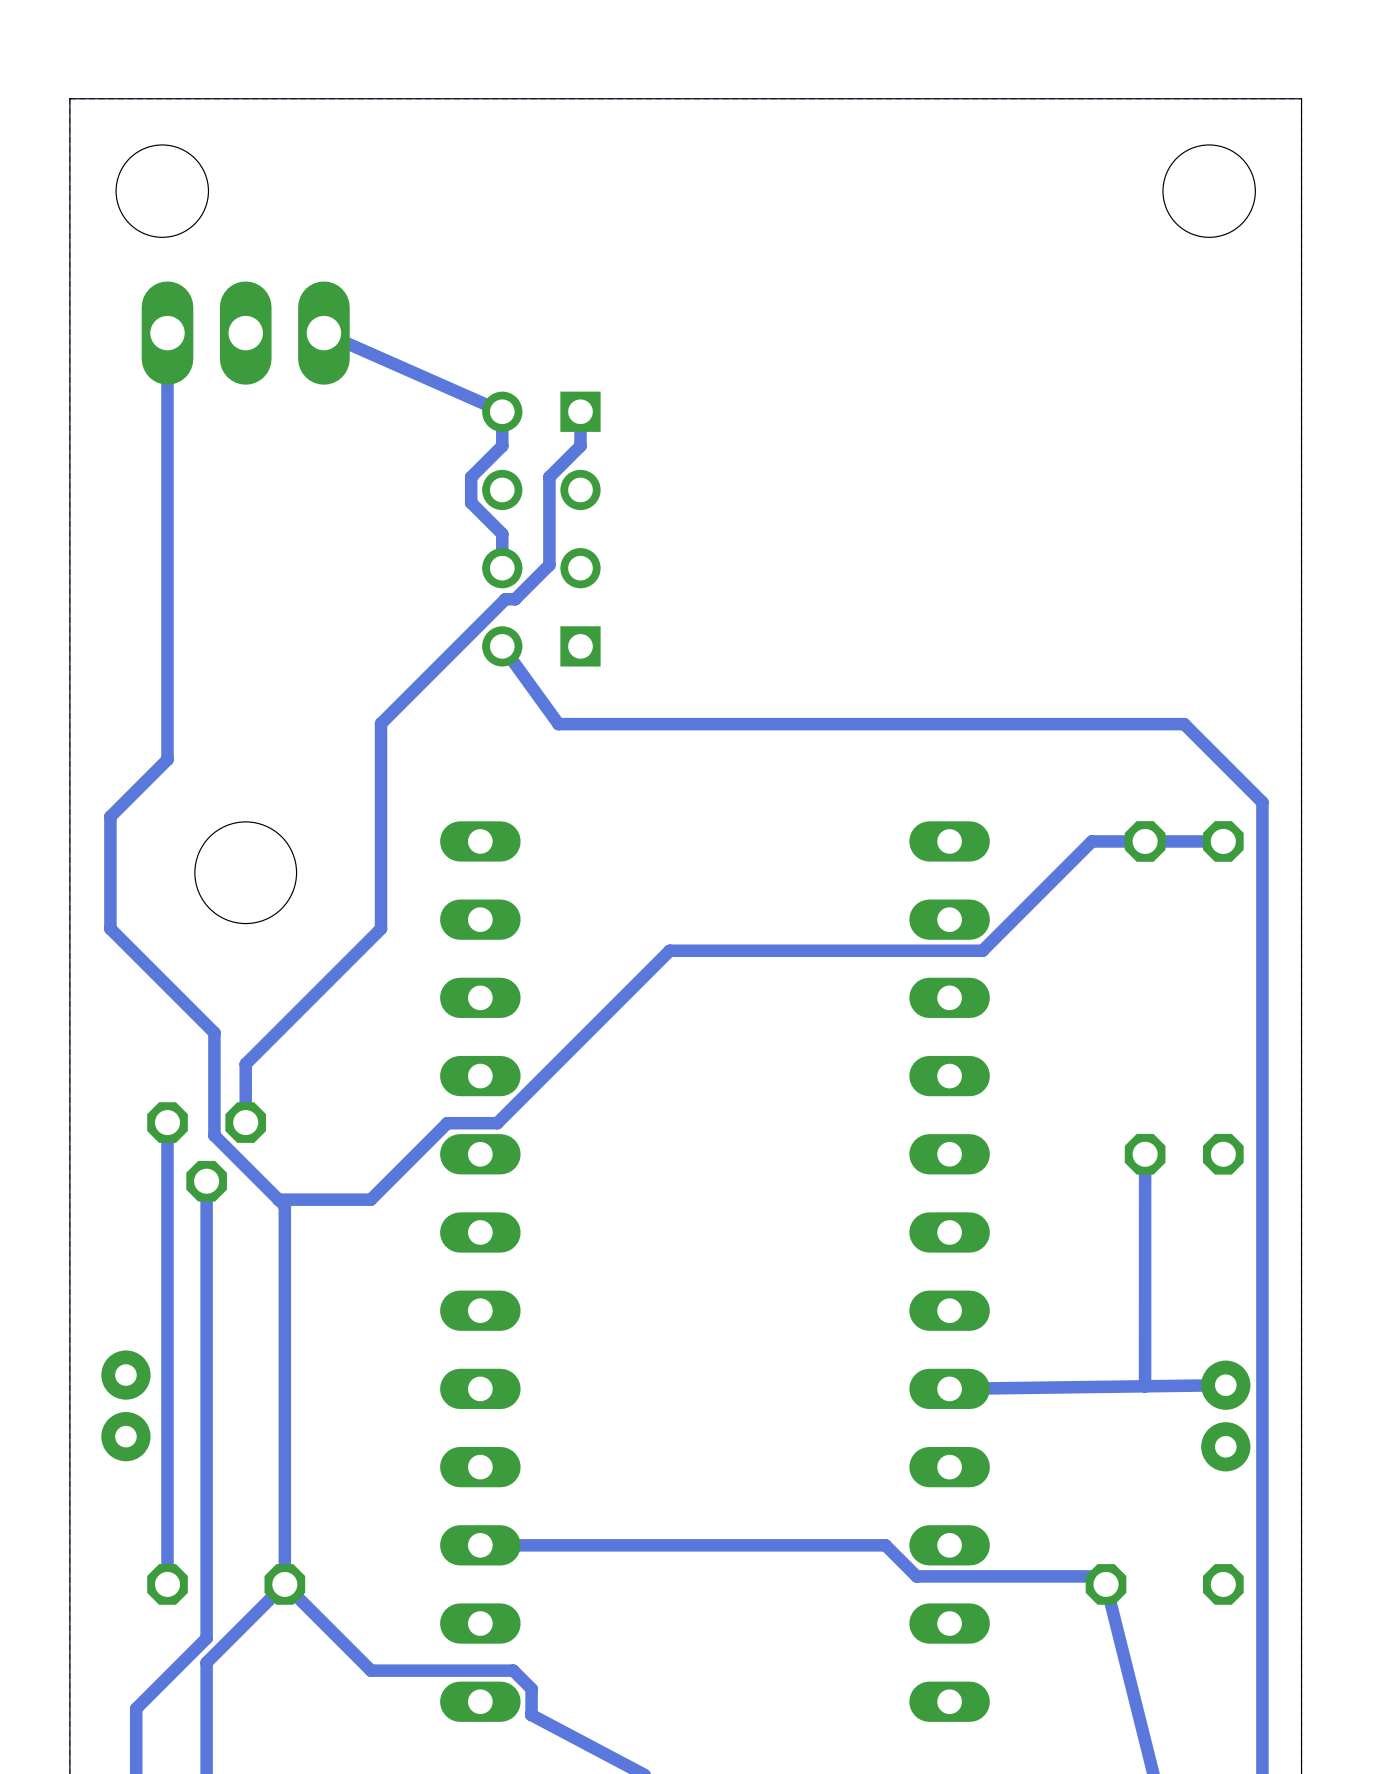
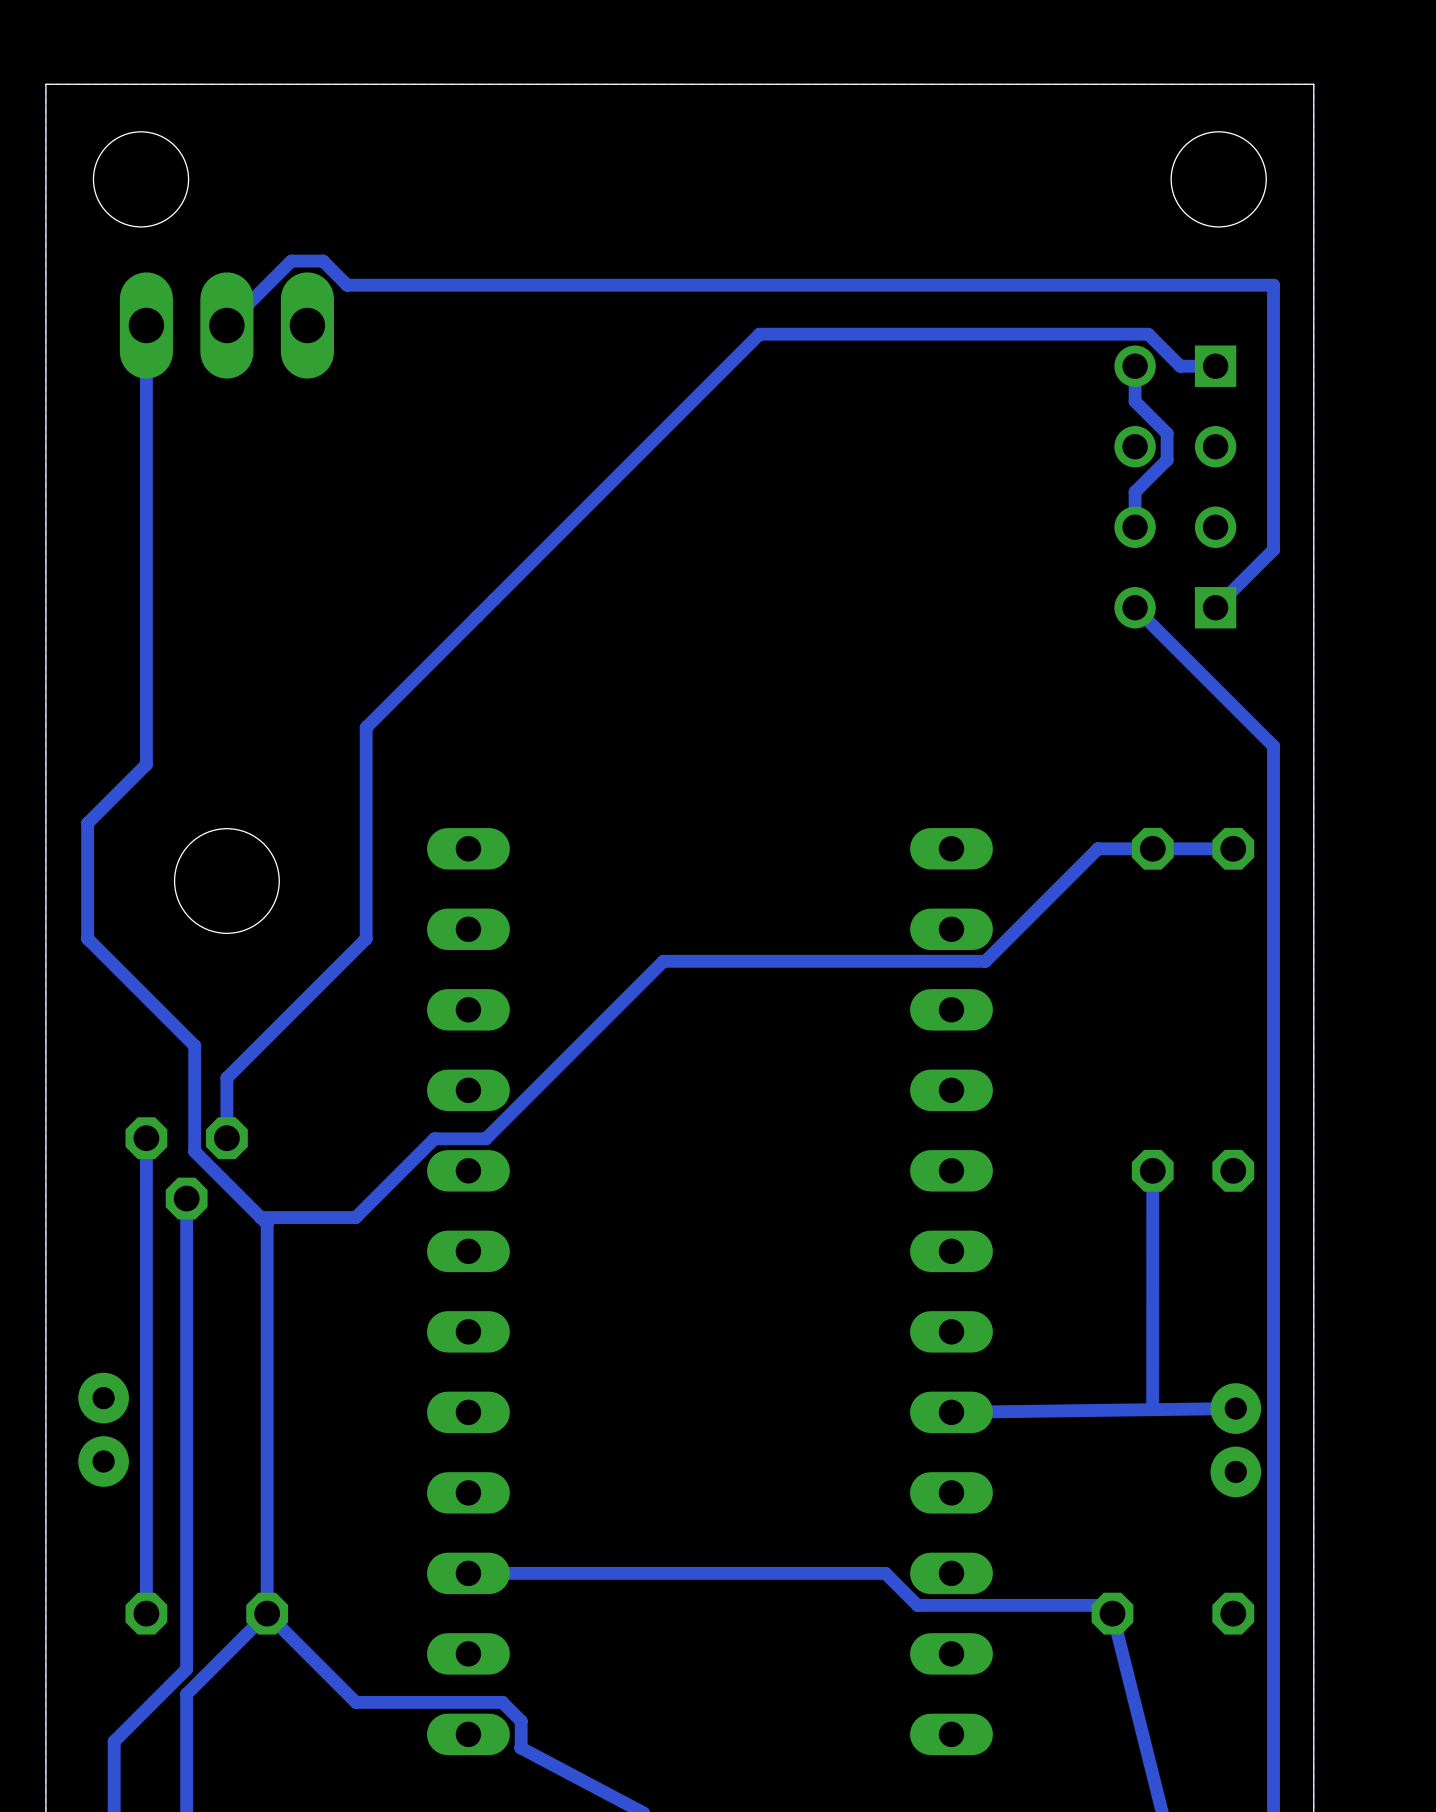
track: none -> (226, 325) (291, 261) (323, 261) (347, 285) (1273, 285) (1273, 549) (1215, 607)
track: (323, 333) (502, 411) (502, 446) (471, 477) (471, 502) (502, 533) (502, 568) -> none
track: none -> (1135, 366) (1135, 401) (1167, 433) (1167, 459) (1135, 491) (1135, 527)
track: (580, 411) (580, 446) (549, 477) (549, 565) (515, 599) (505, 599) -> (1215, 366) (1180, 366) (1148, 334) (759, 334) (494, 599)
part position: (541, 529) -> (1175, 486)
track: (502, 646) (558, 724) (1184, 724) (1262, 802) -> (1135, 607) (1273, 746) (1273, 808)

